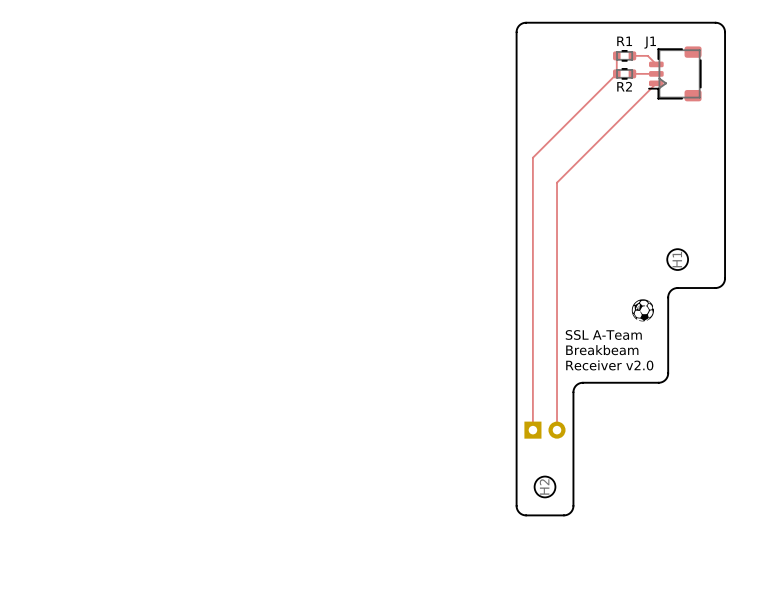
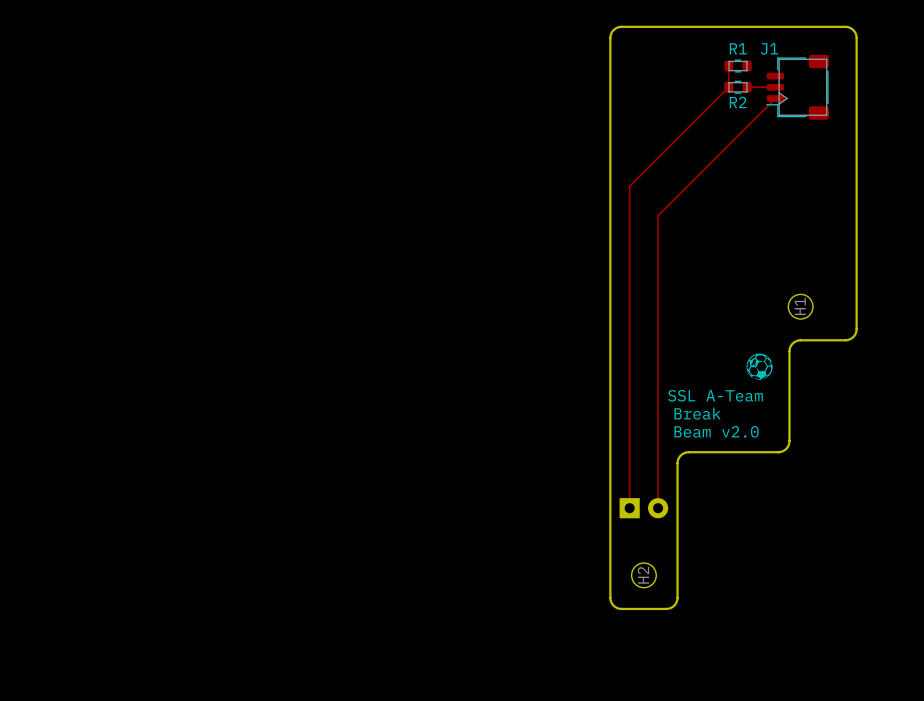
top track: (632, 55) (647, 55) (656, 64) -> none
text: Breakbeam (602, 350) -> Break (697, 413)
text: Receiver v2.0 (609, 365) -> Beam v2.0 (716, 431)

